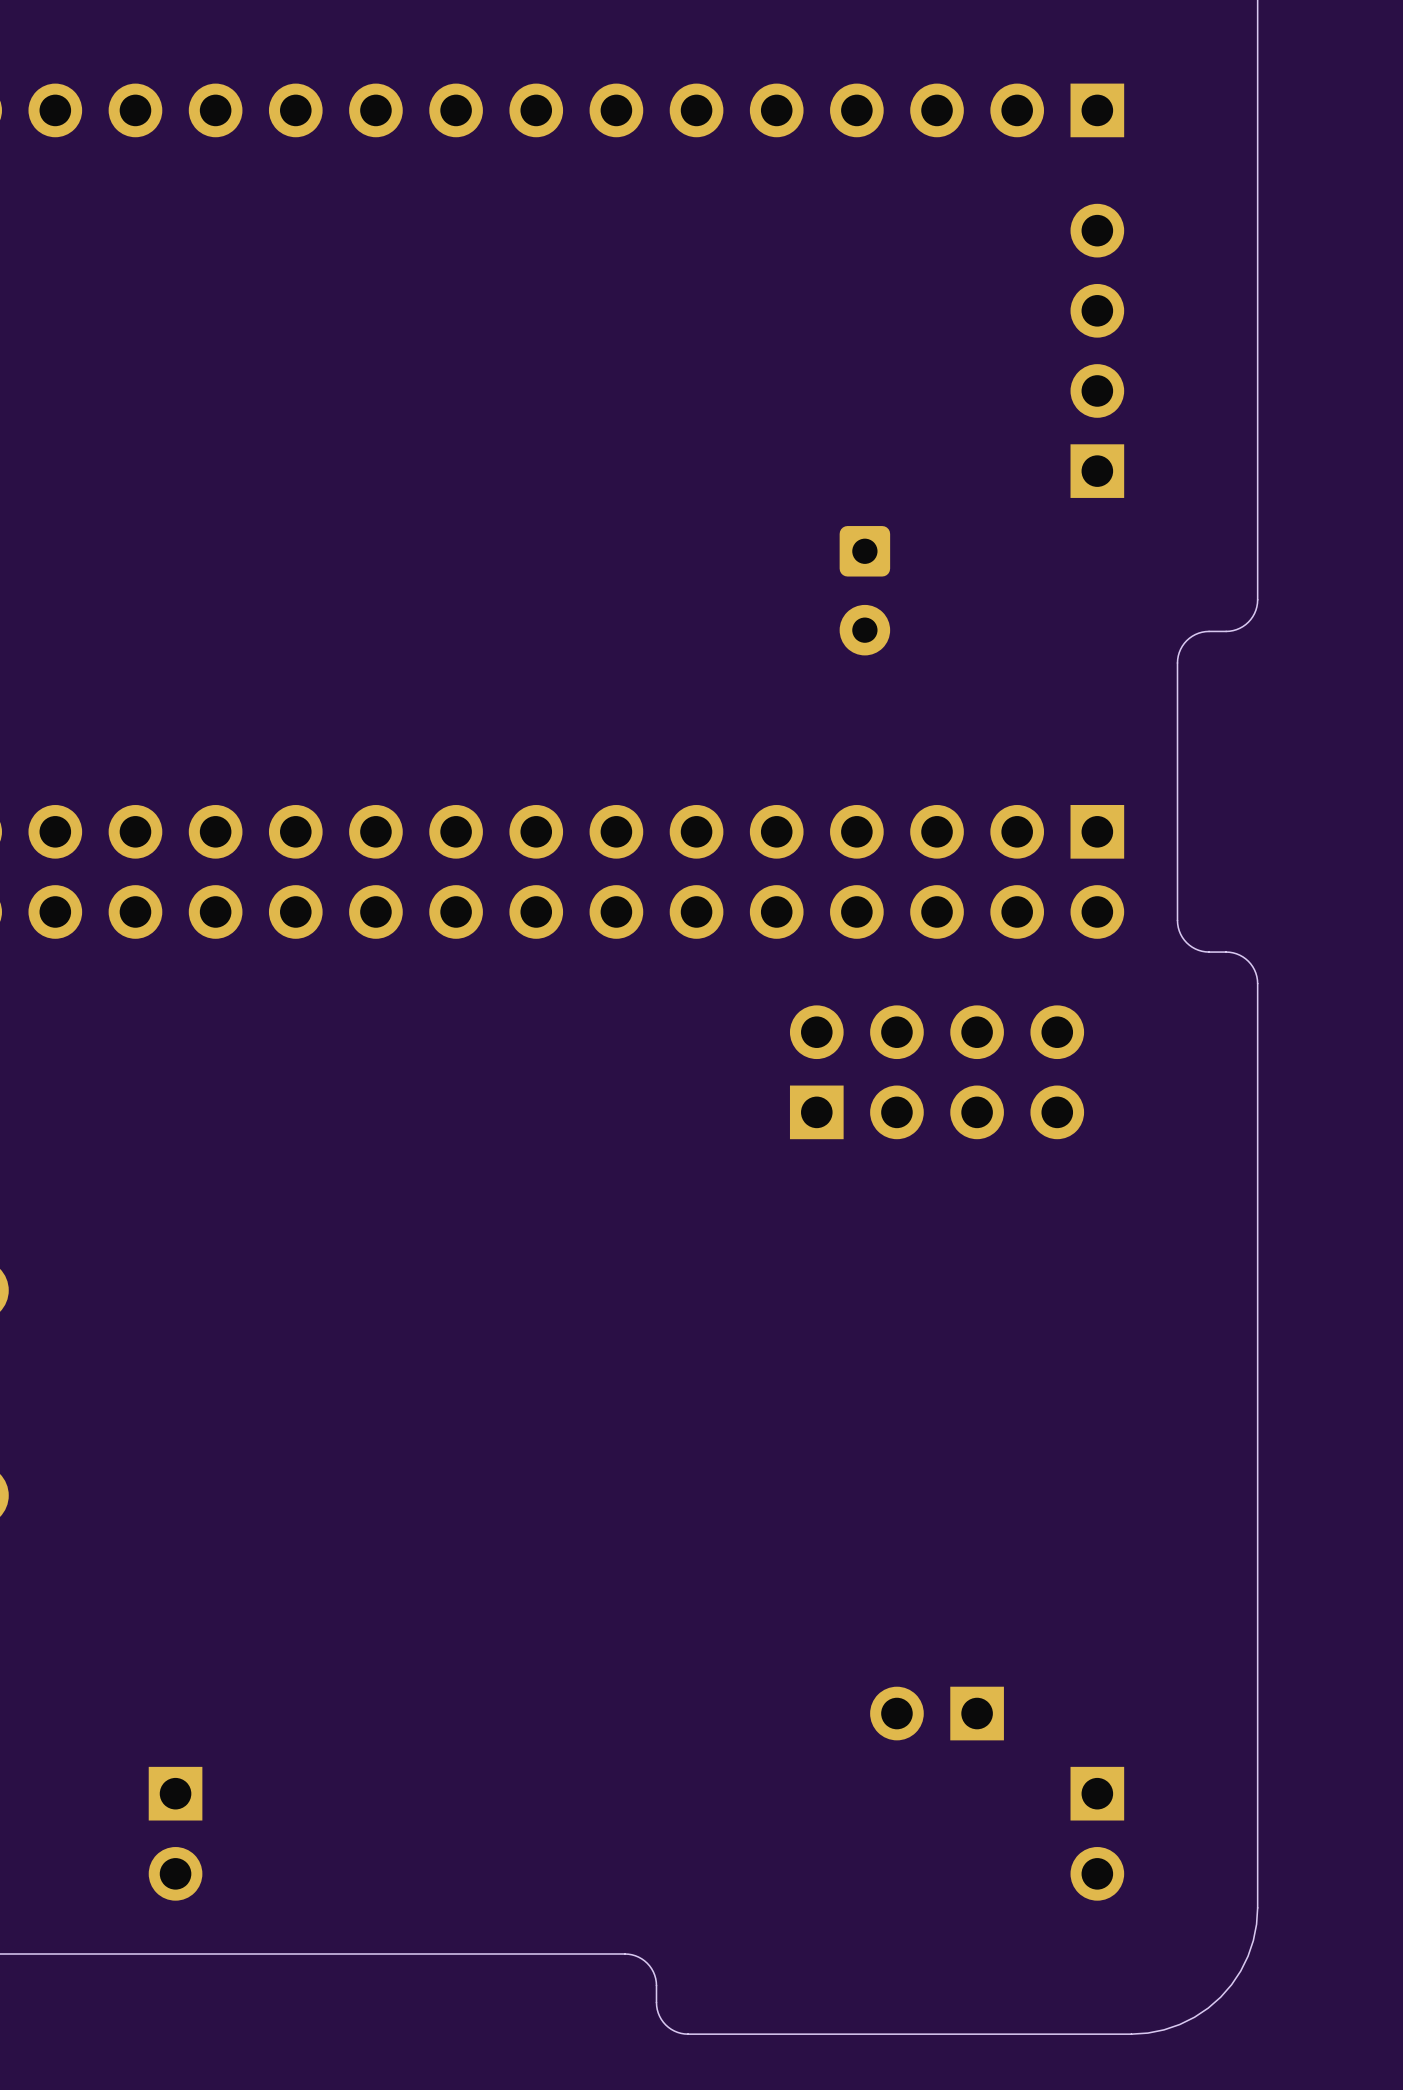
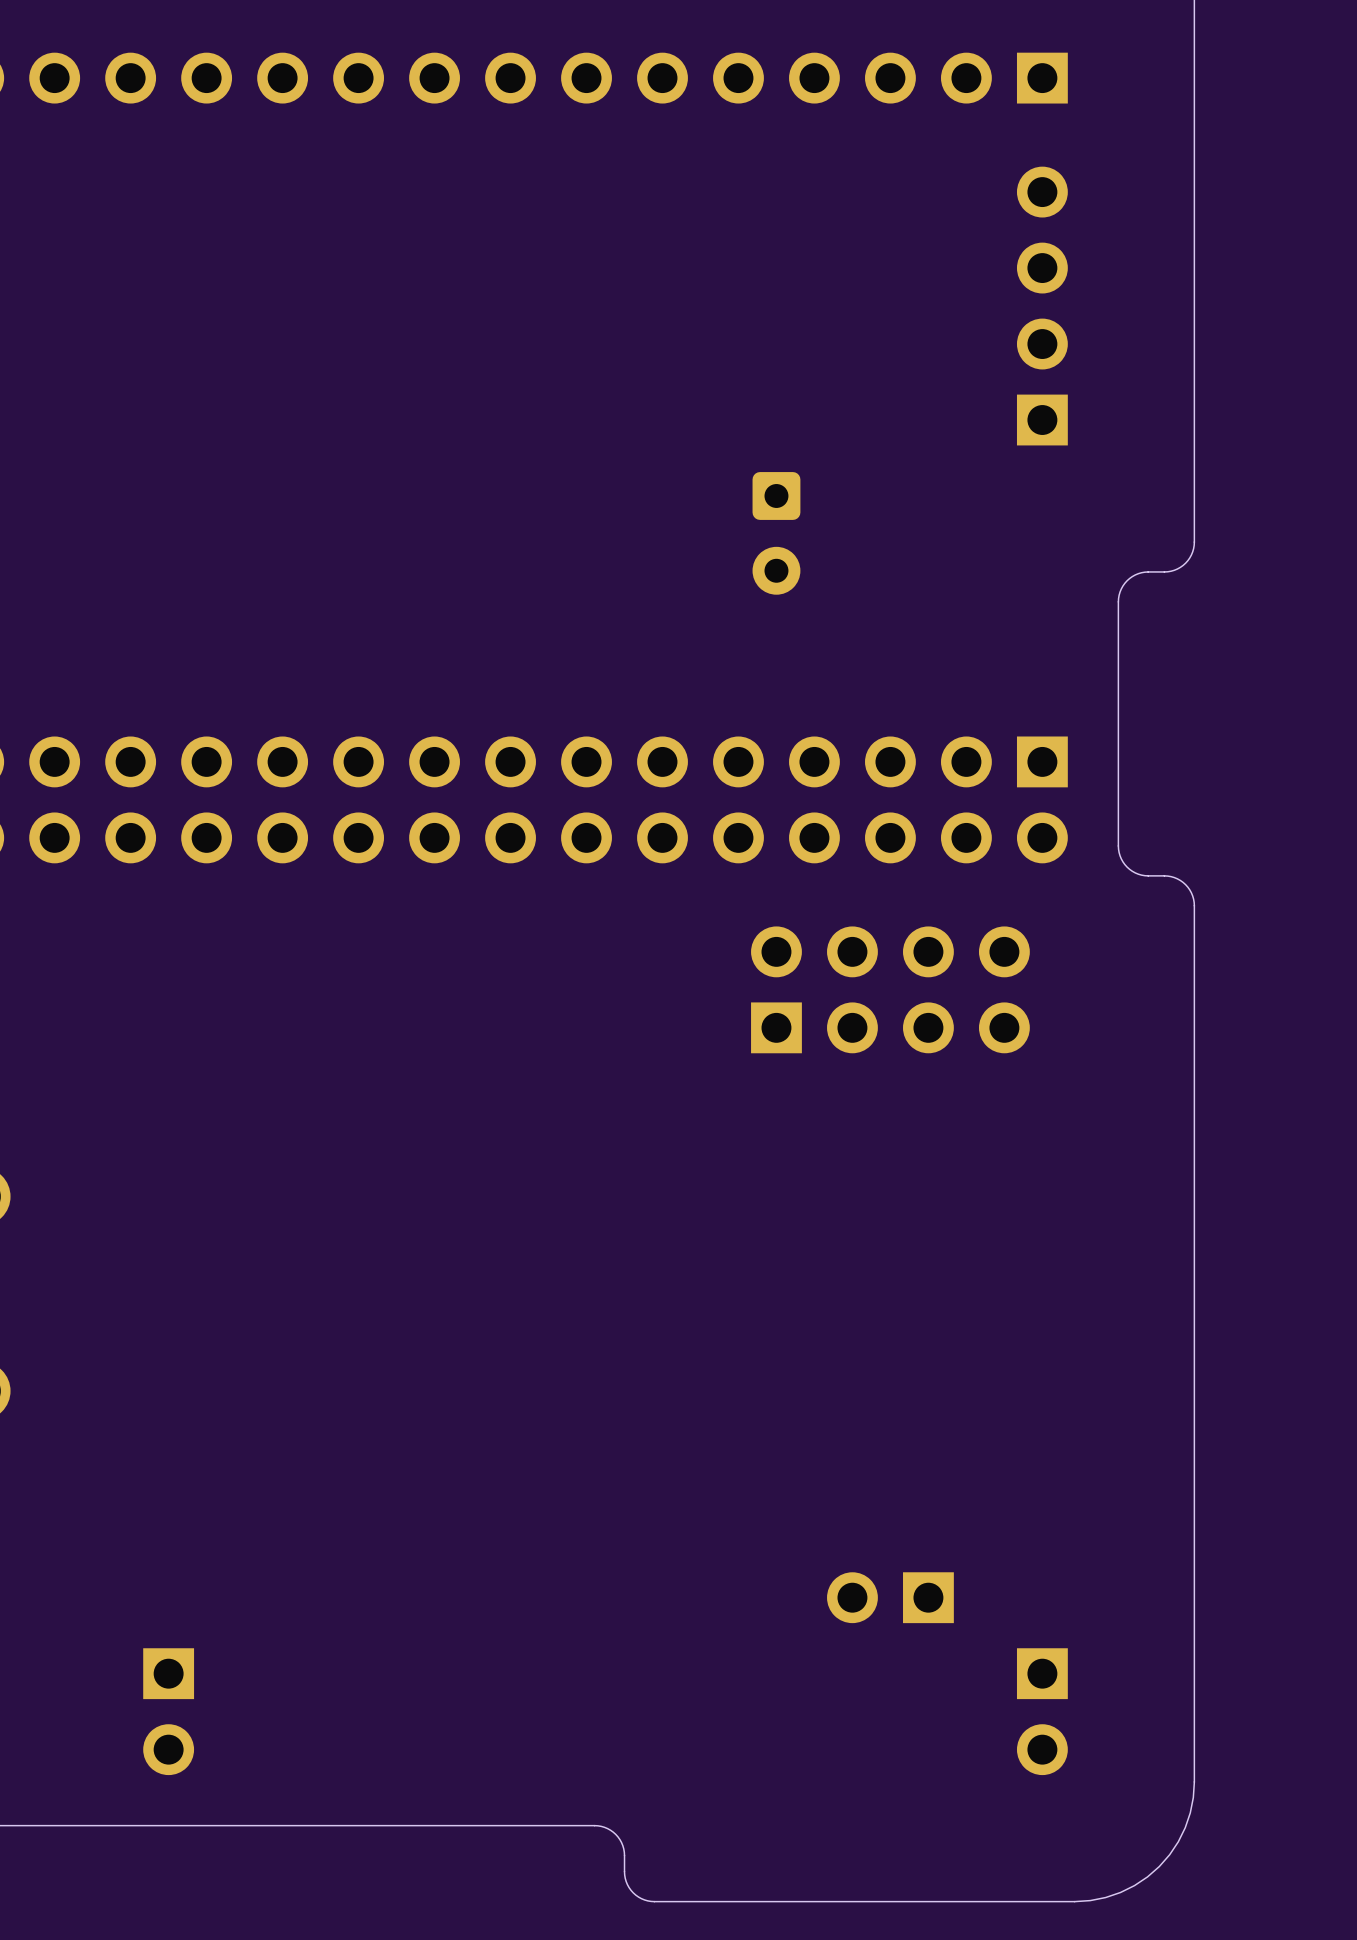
part position: (864, 590) -> (776, 533)

